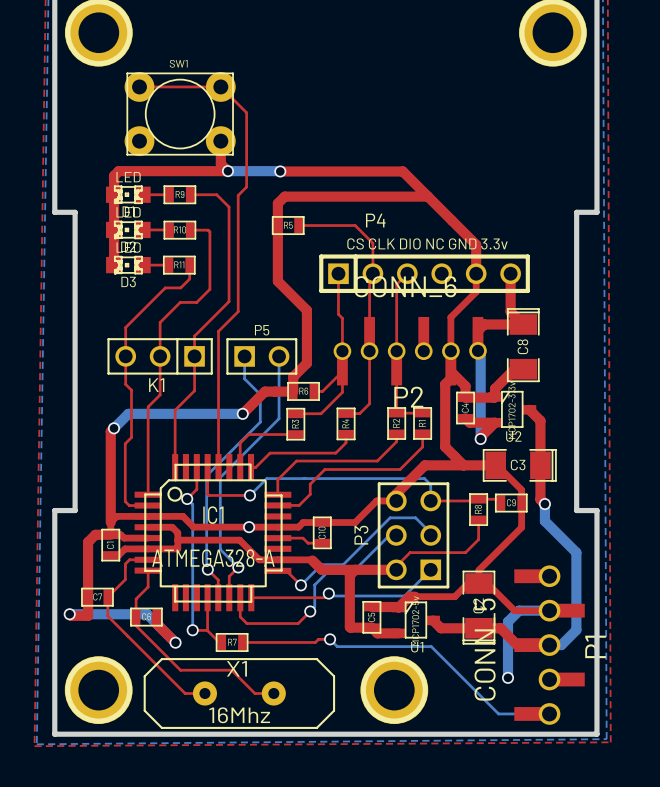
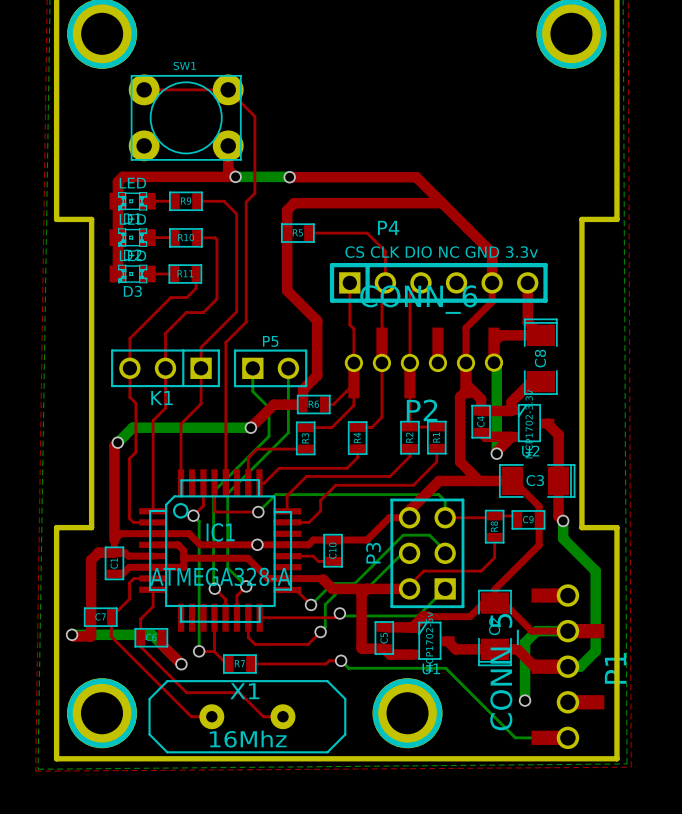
board edge: (75, 212) (75, 510) -> (77, 219) (91, 219) (91, 527) (77, 527)
board edge: (576, 212) (576, 510) -> (595, 219) (581, 219) (581, 527) (595, 527)

